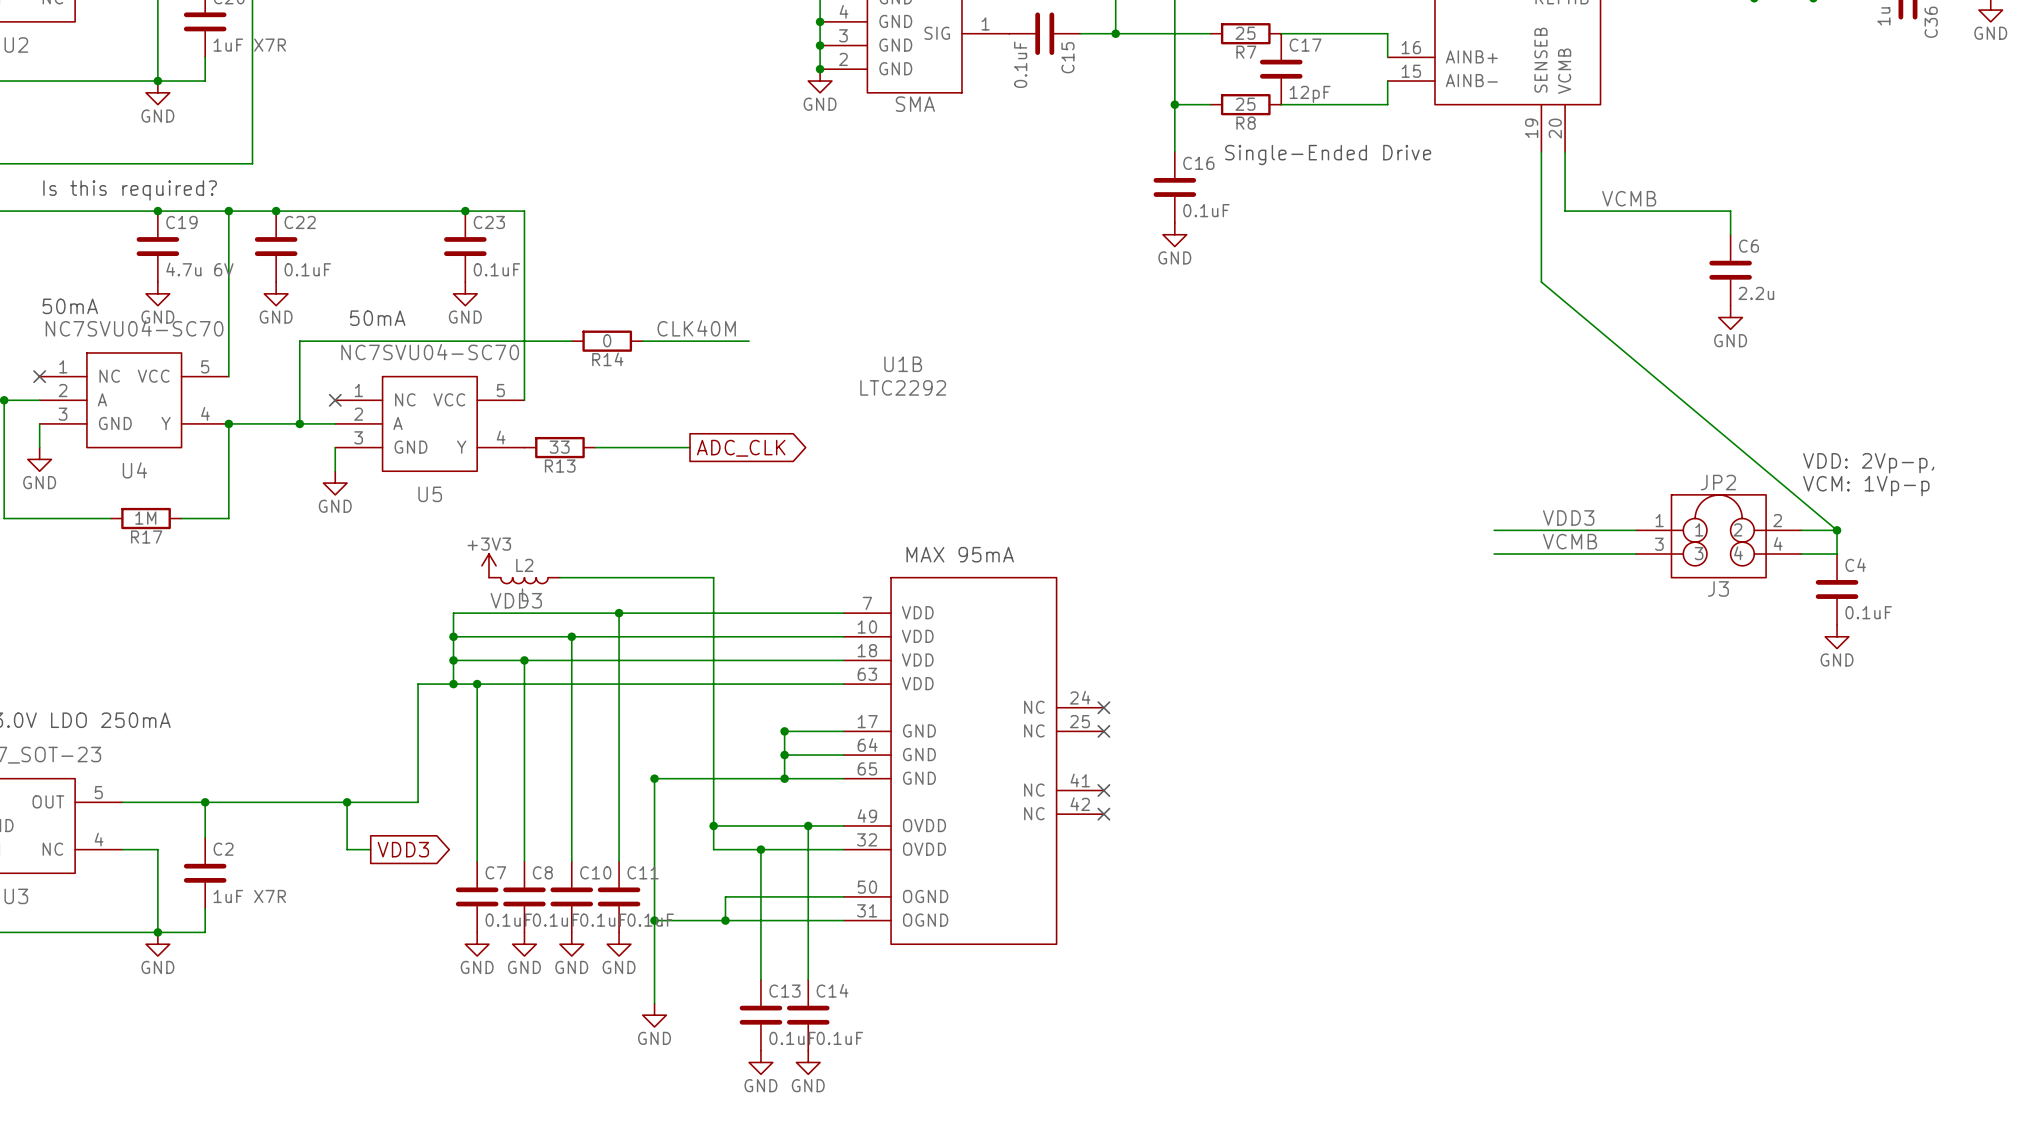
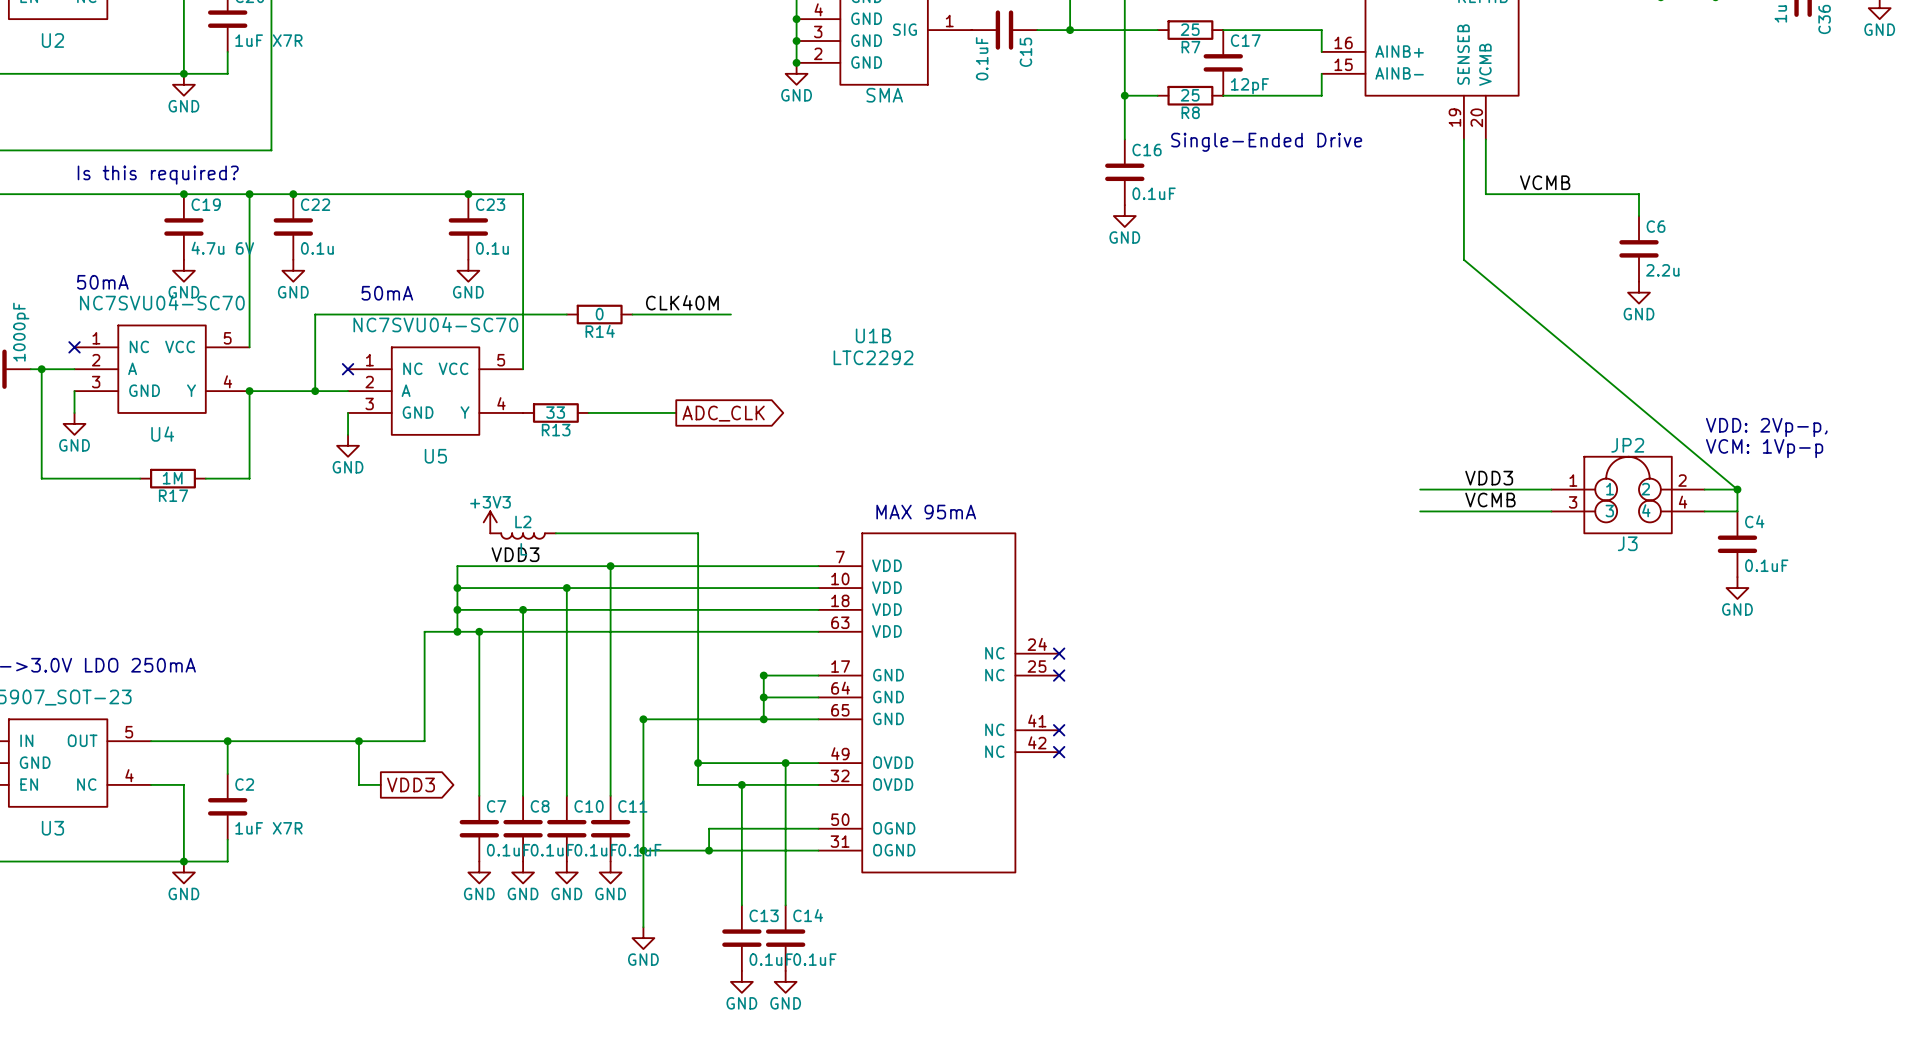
C22 value: 0.1uF (307, 269) -> 0.1u (317, 248)
C23 value: 0.1uF (496, 269) -> 0.1u (492, 248)

